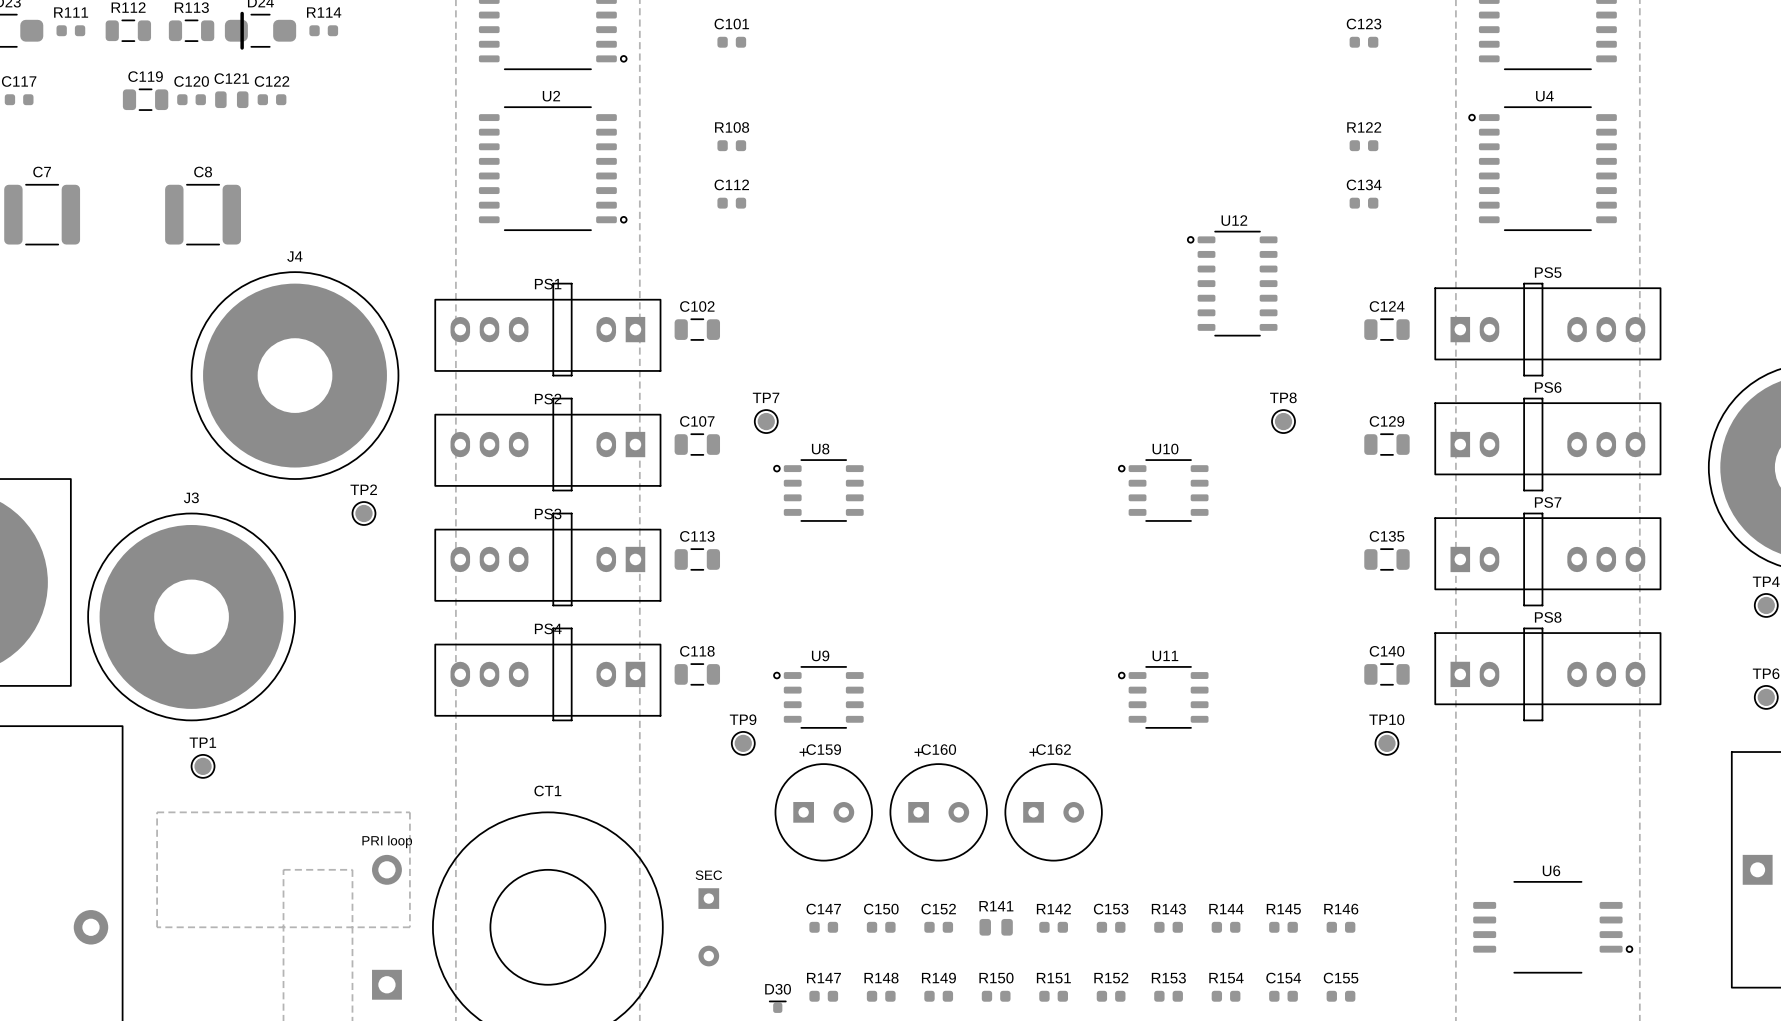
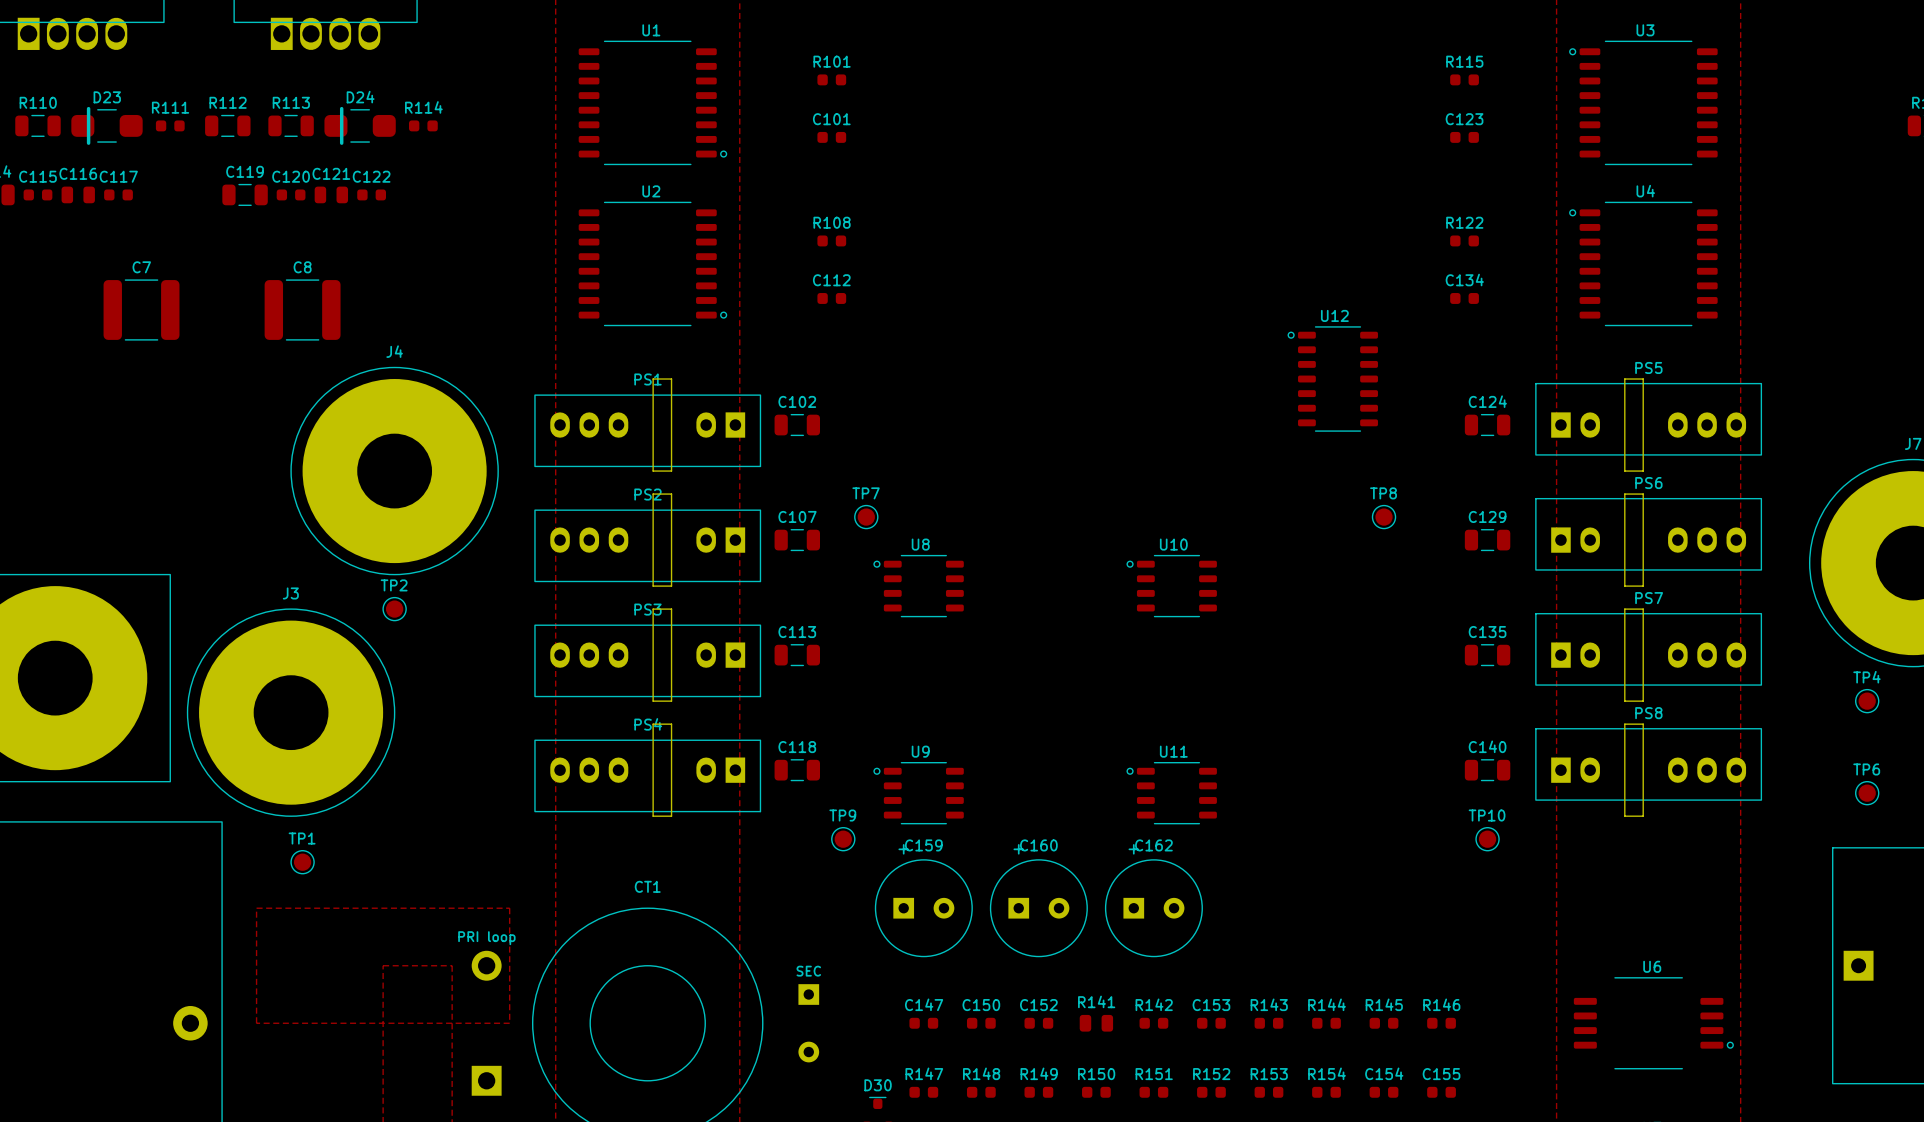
U10 position: (1163, 490) -> (1171, 586)
TP2 position: (363, 513) -> (394, 609)
U11 position: (1163, 697) -> (1171, 793)

